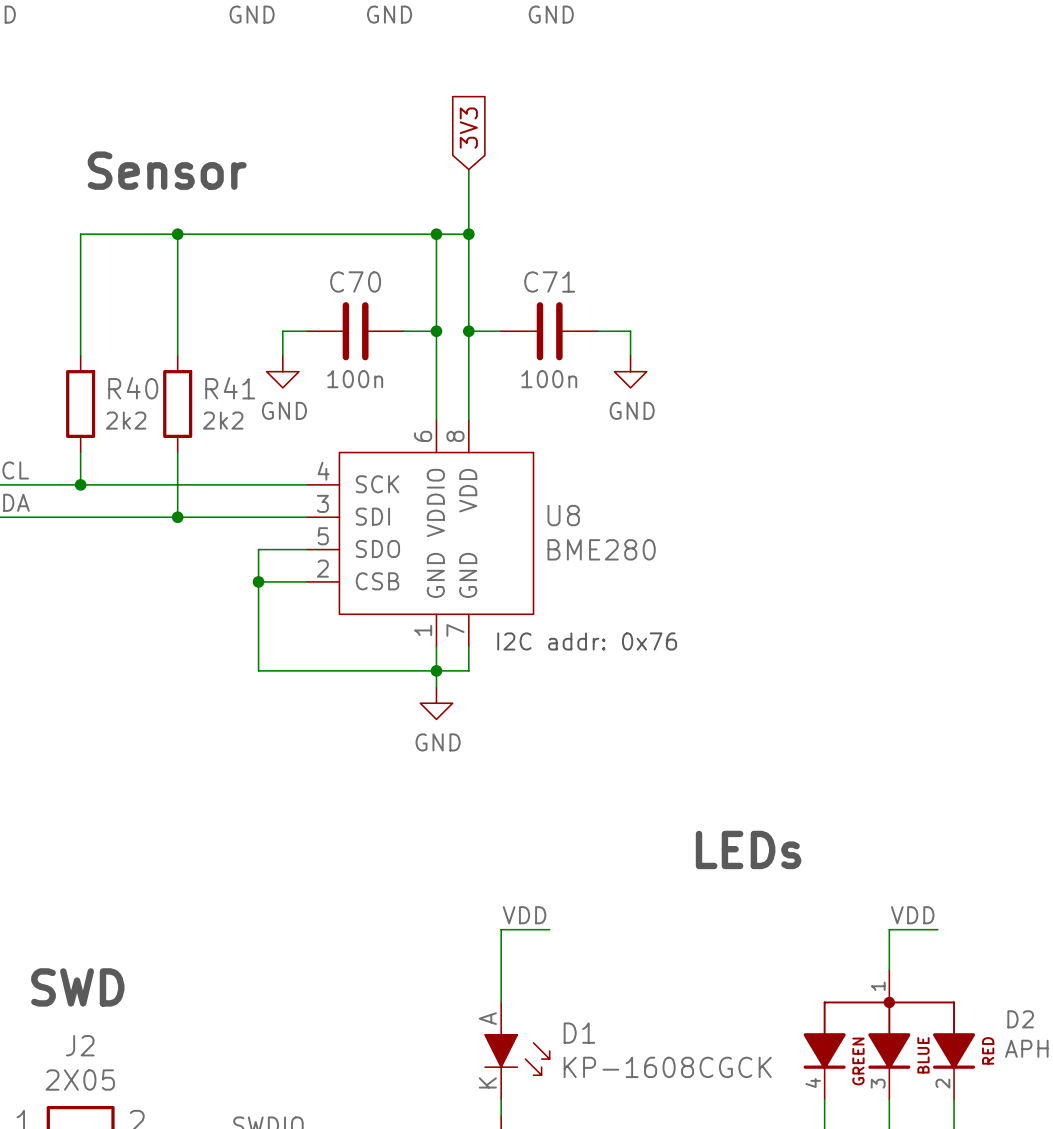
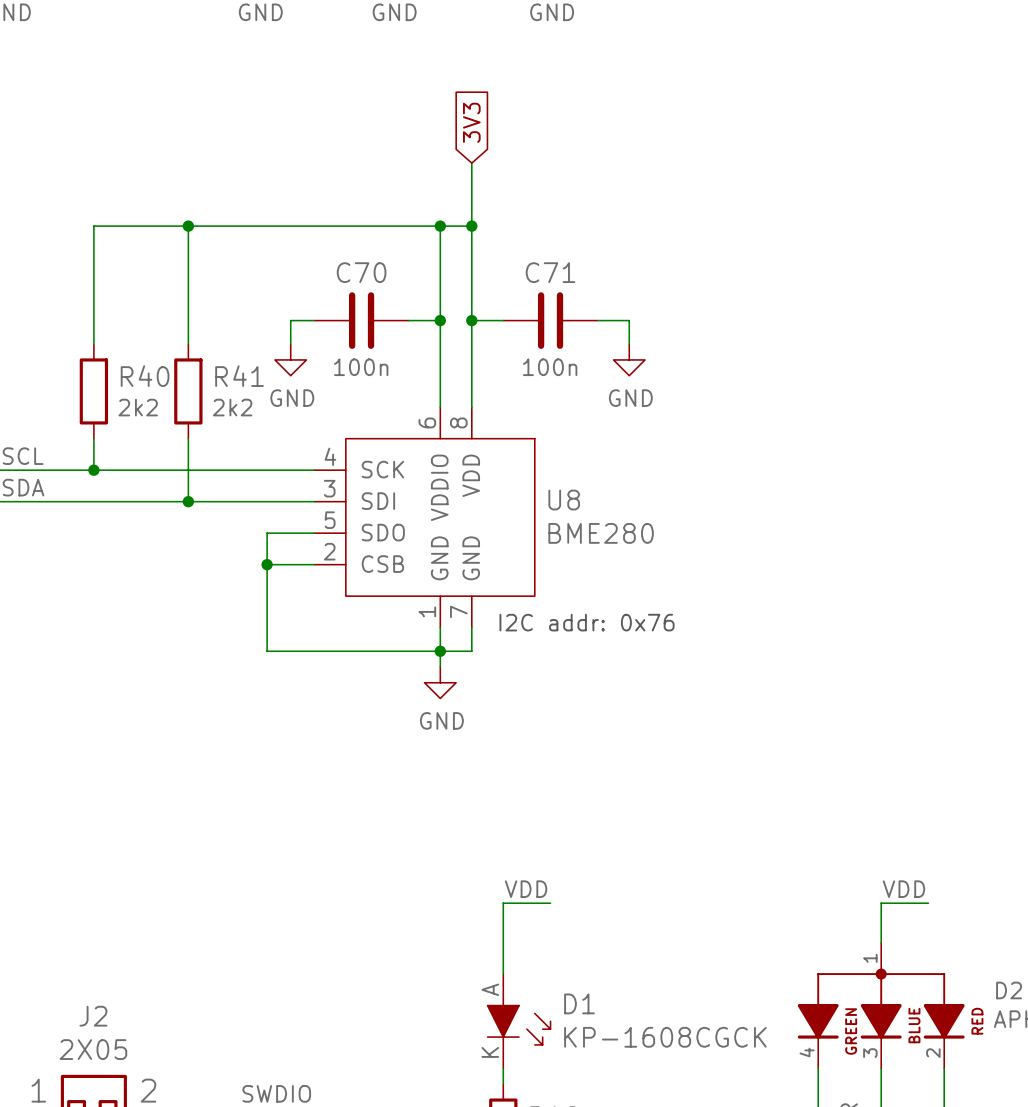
text: Sensor (167, 170) -> none
text: LEDs (748, 849) -> none
text: SWD (77, 987) -> none

